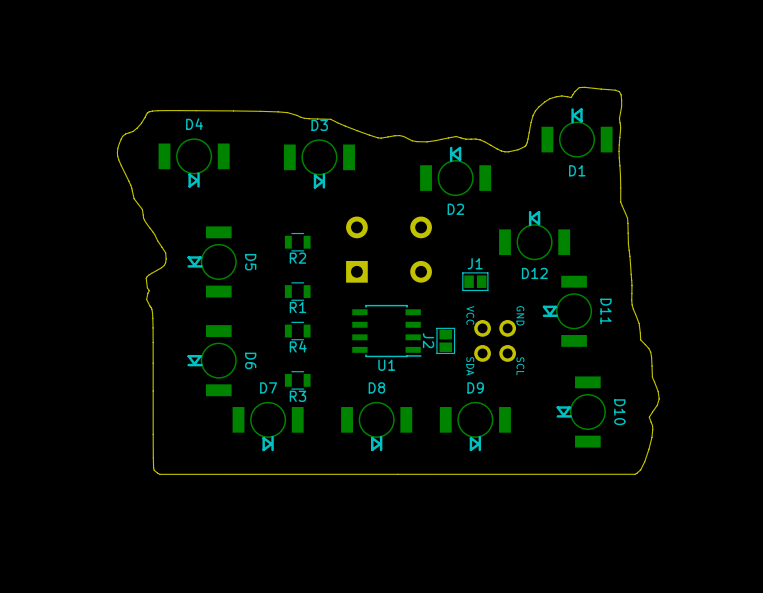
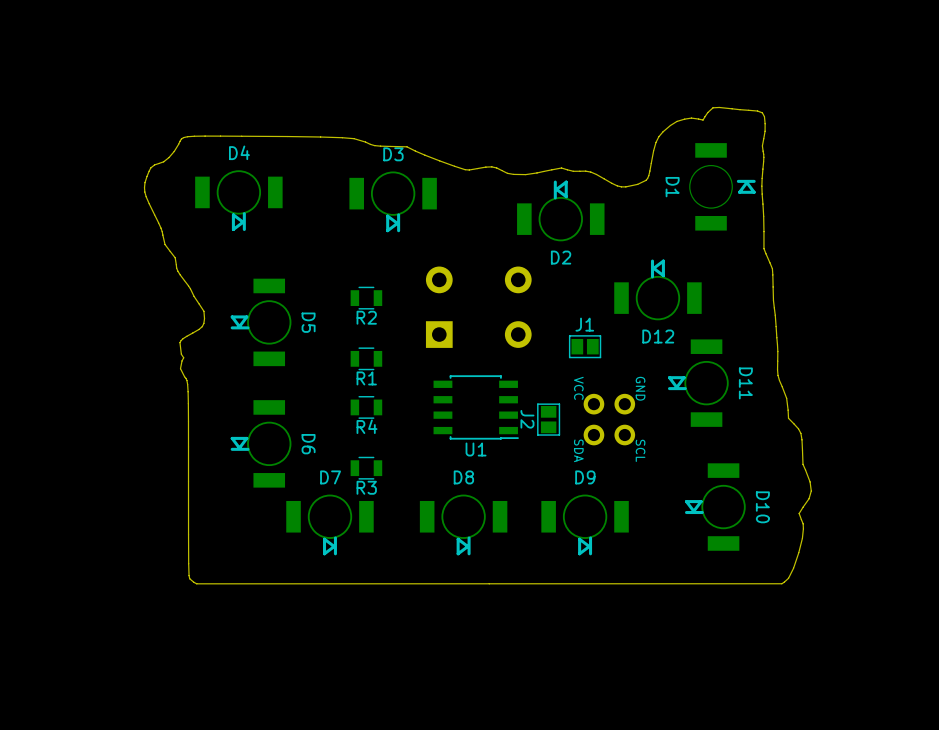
D1 footprint: [541, 108, 613, 158] -> [689, 143, 756, 231]
D1 name position: D1 (577, 170) -> D1 (672, 187)

